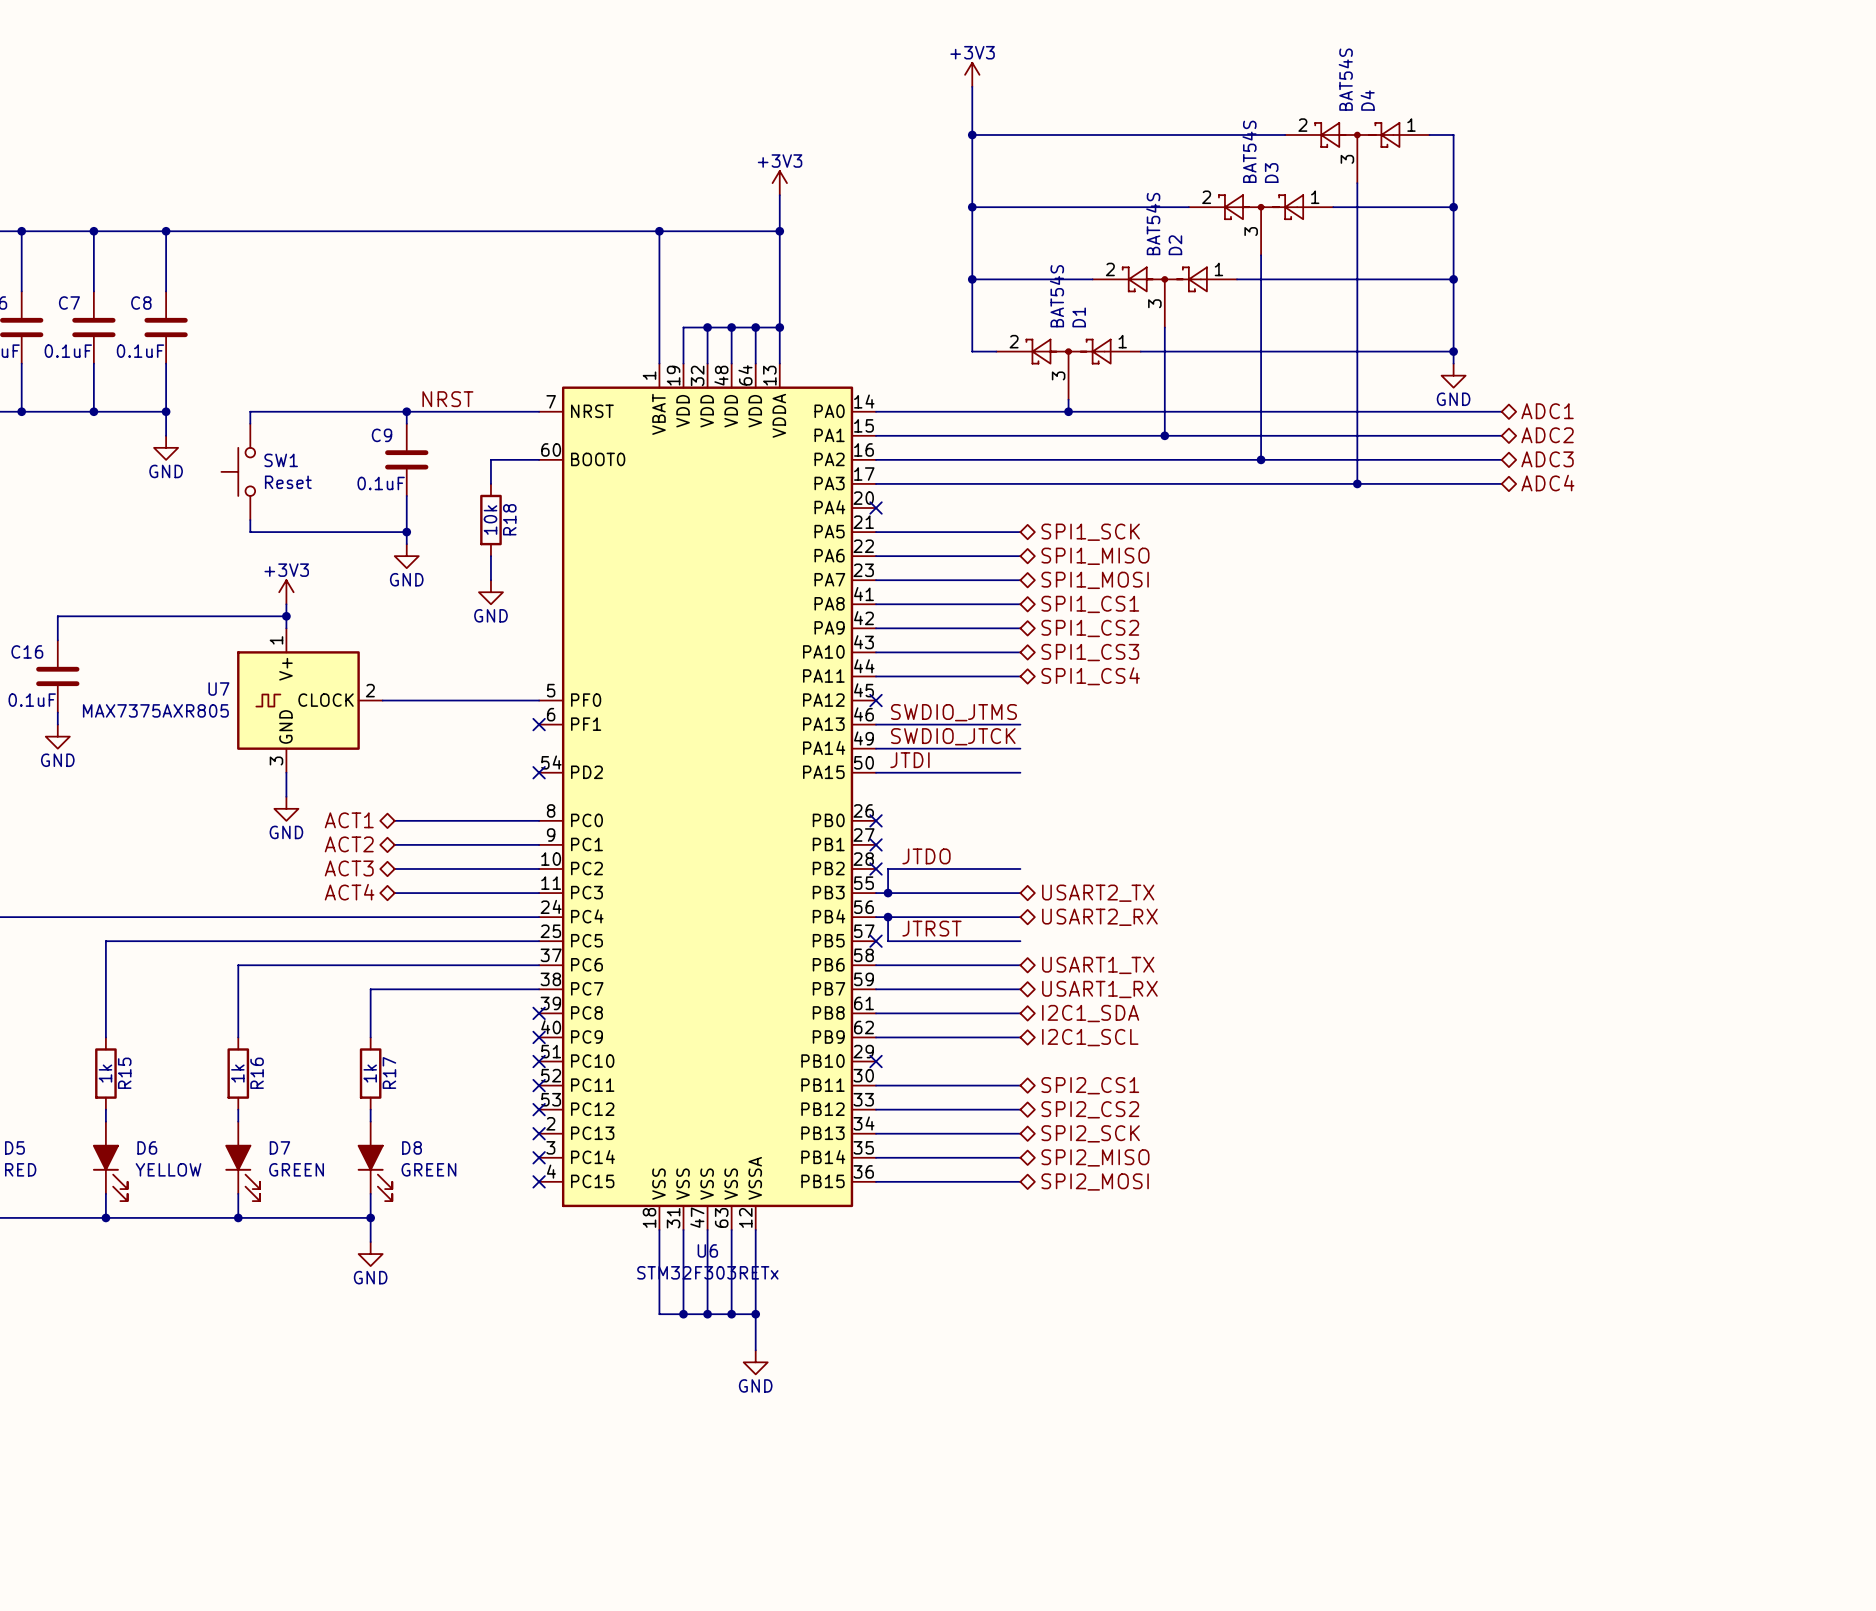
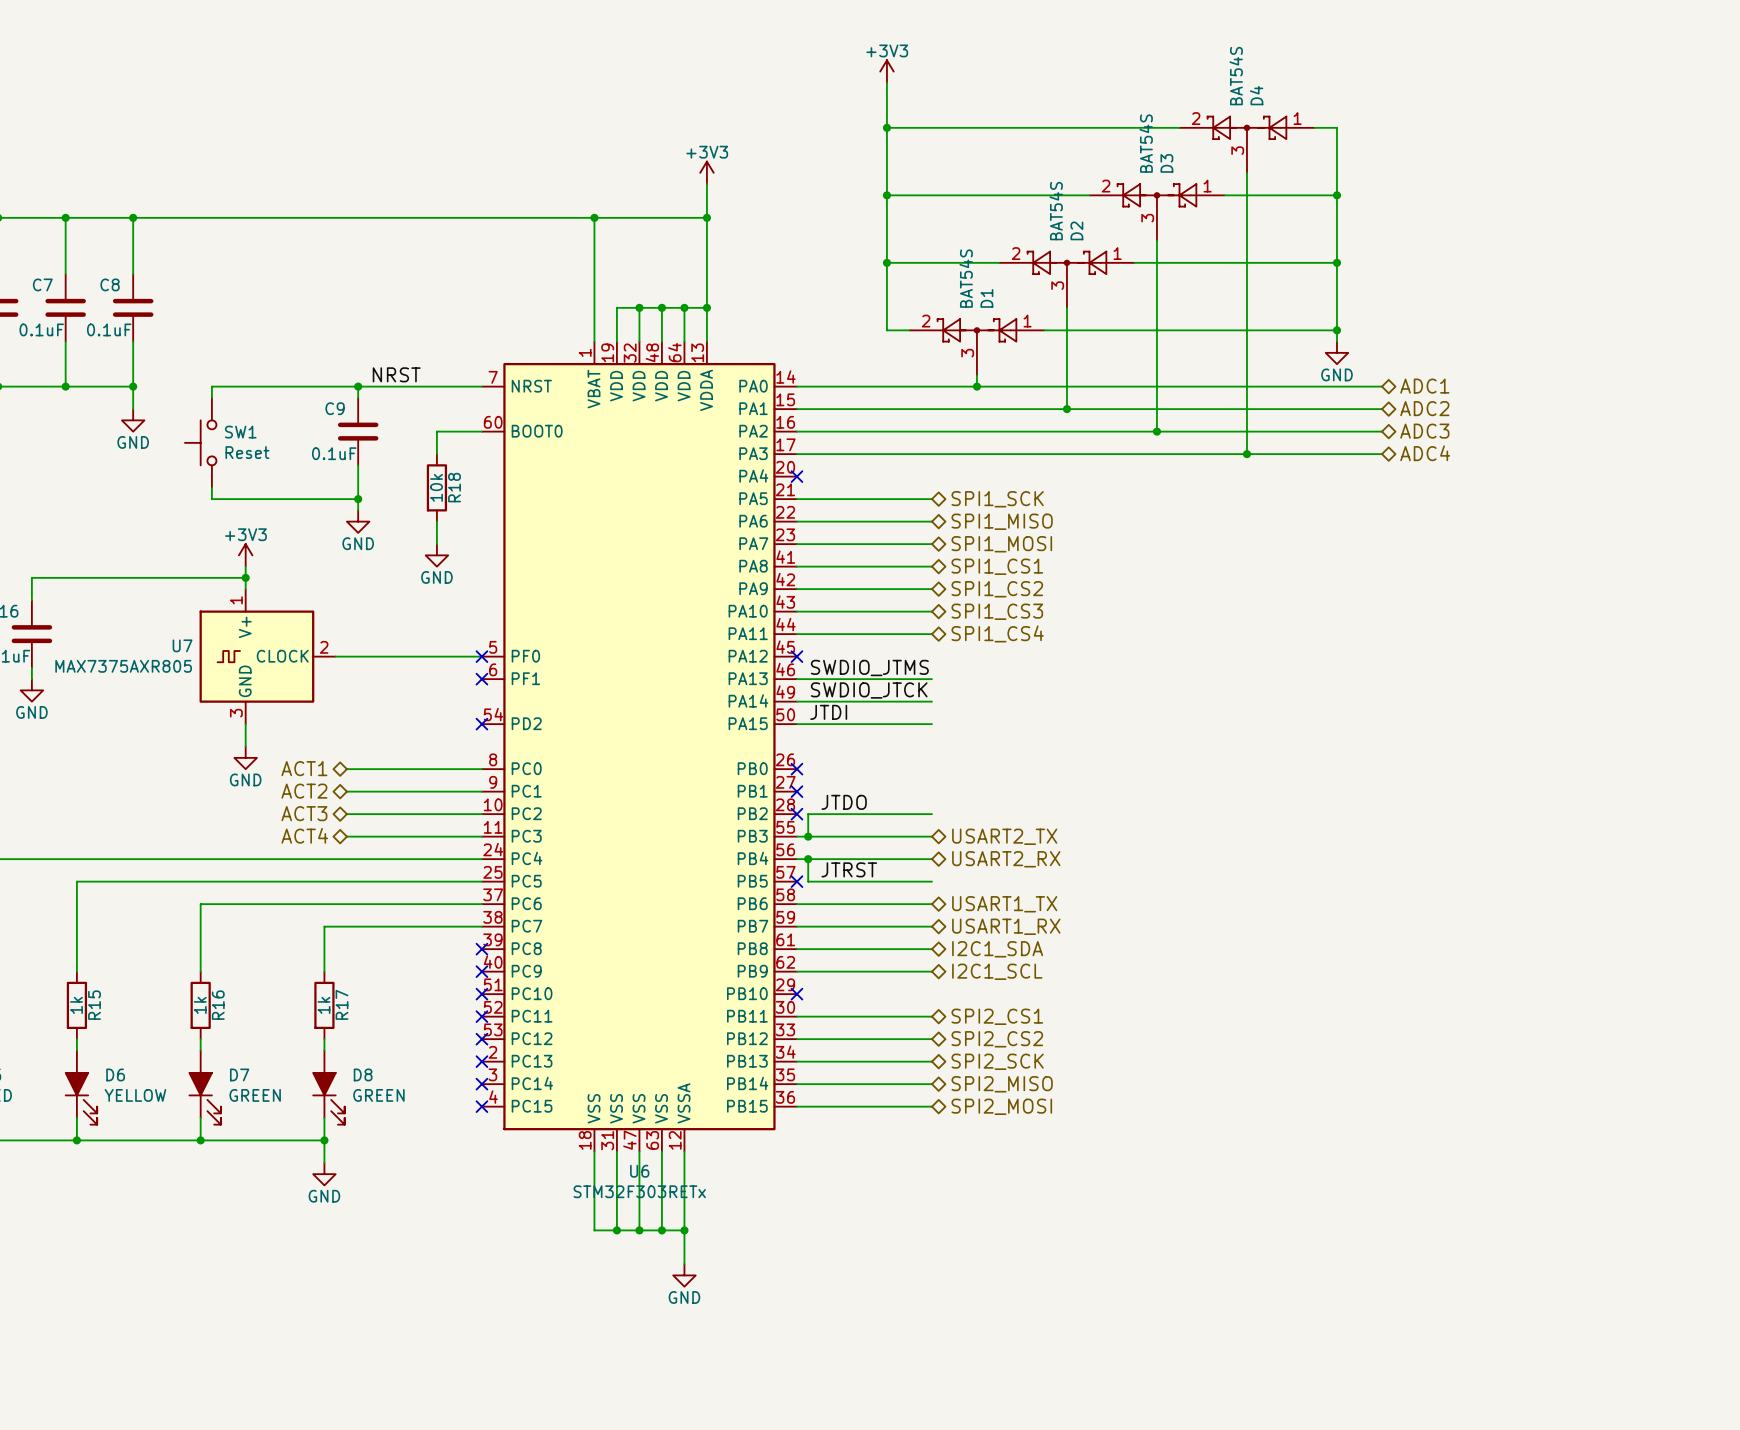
no-connect mark: none -> (481, 656)

